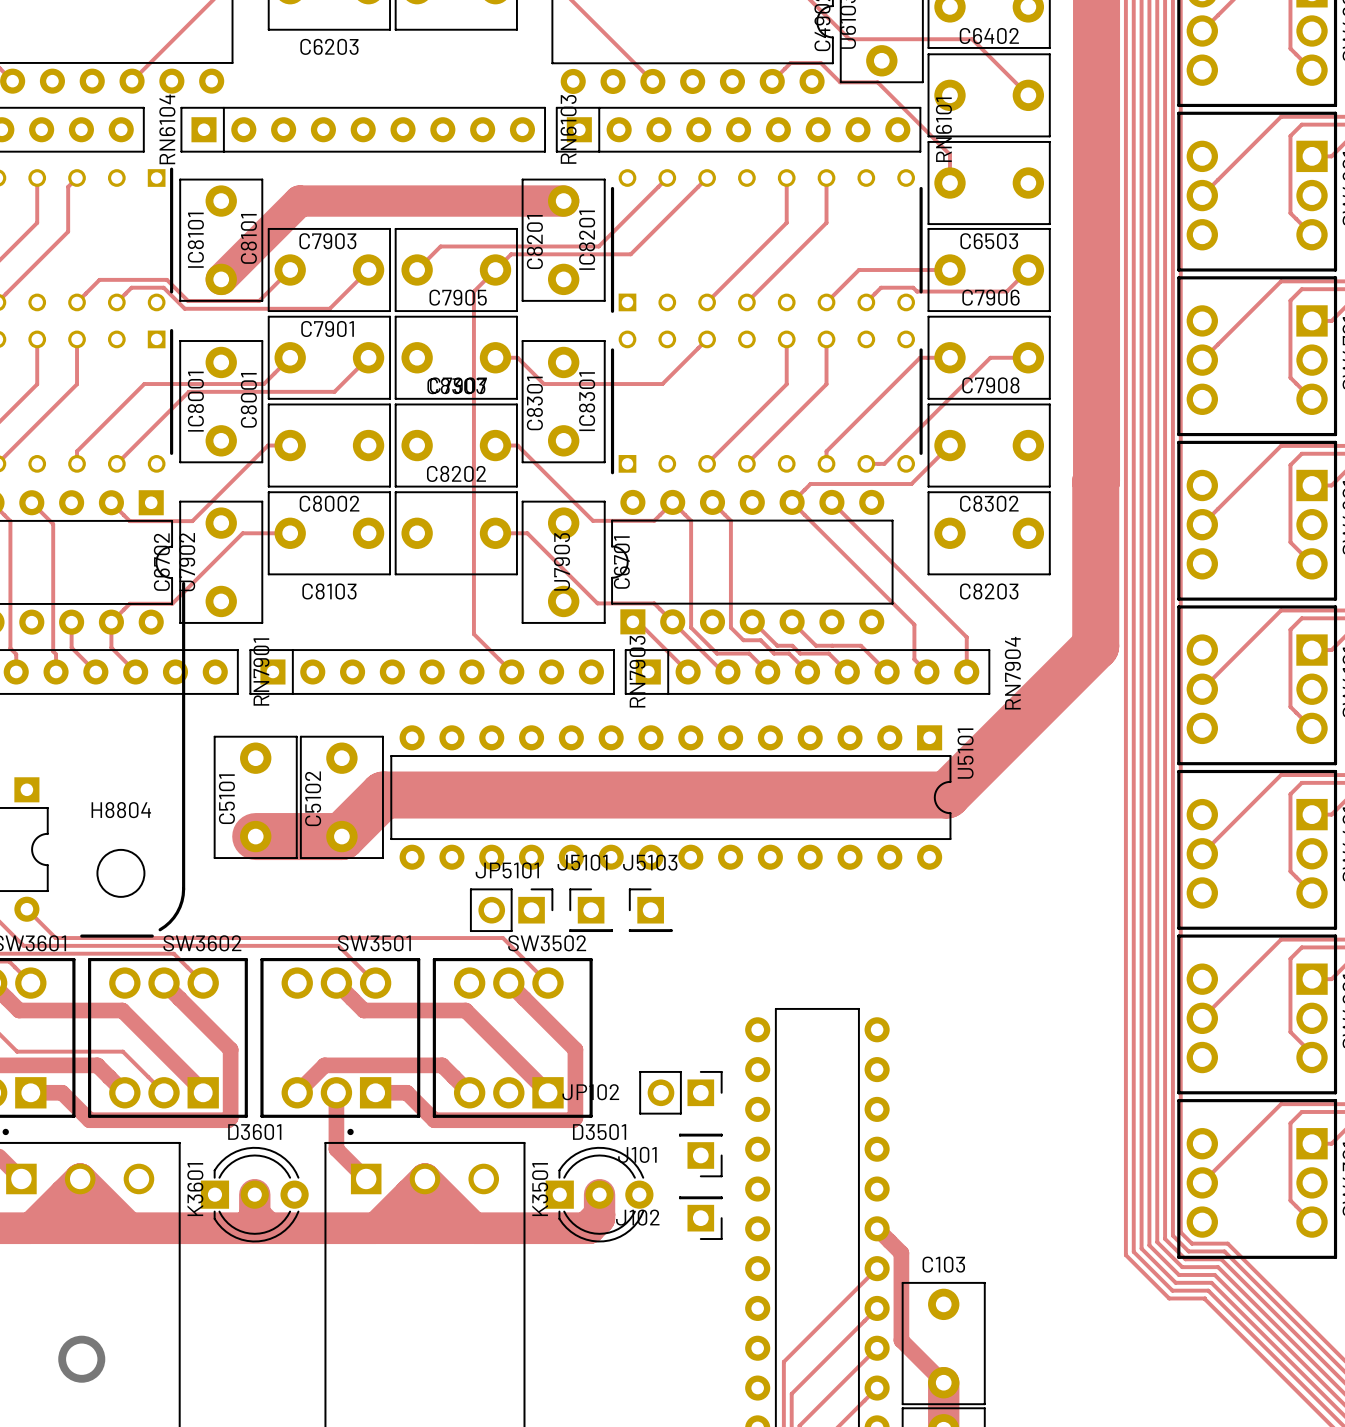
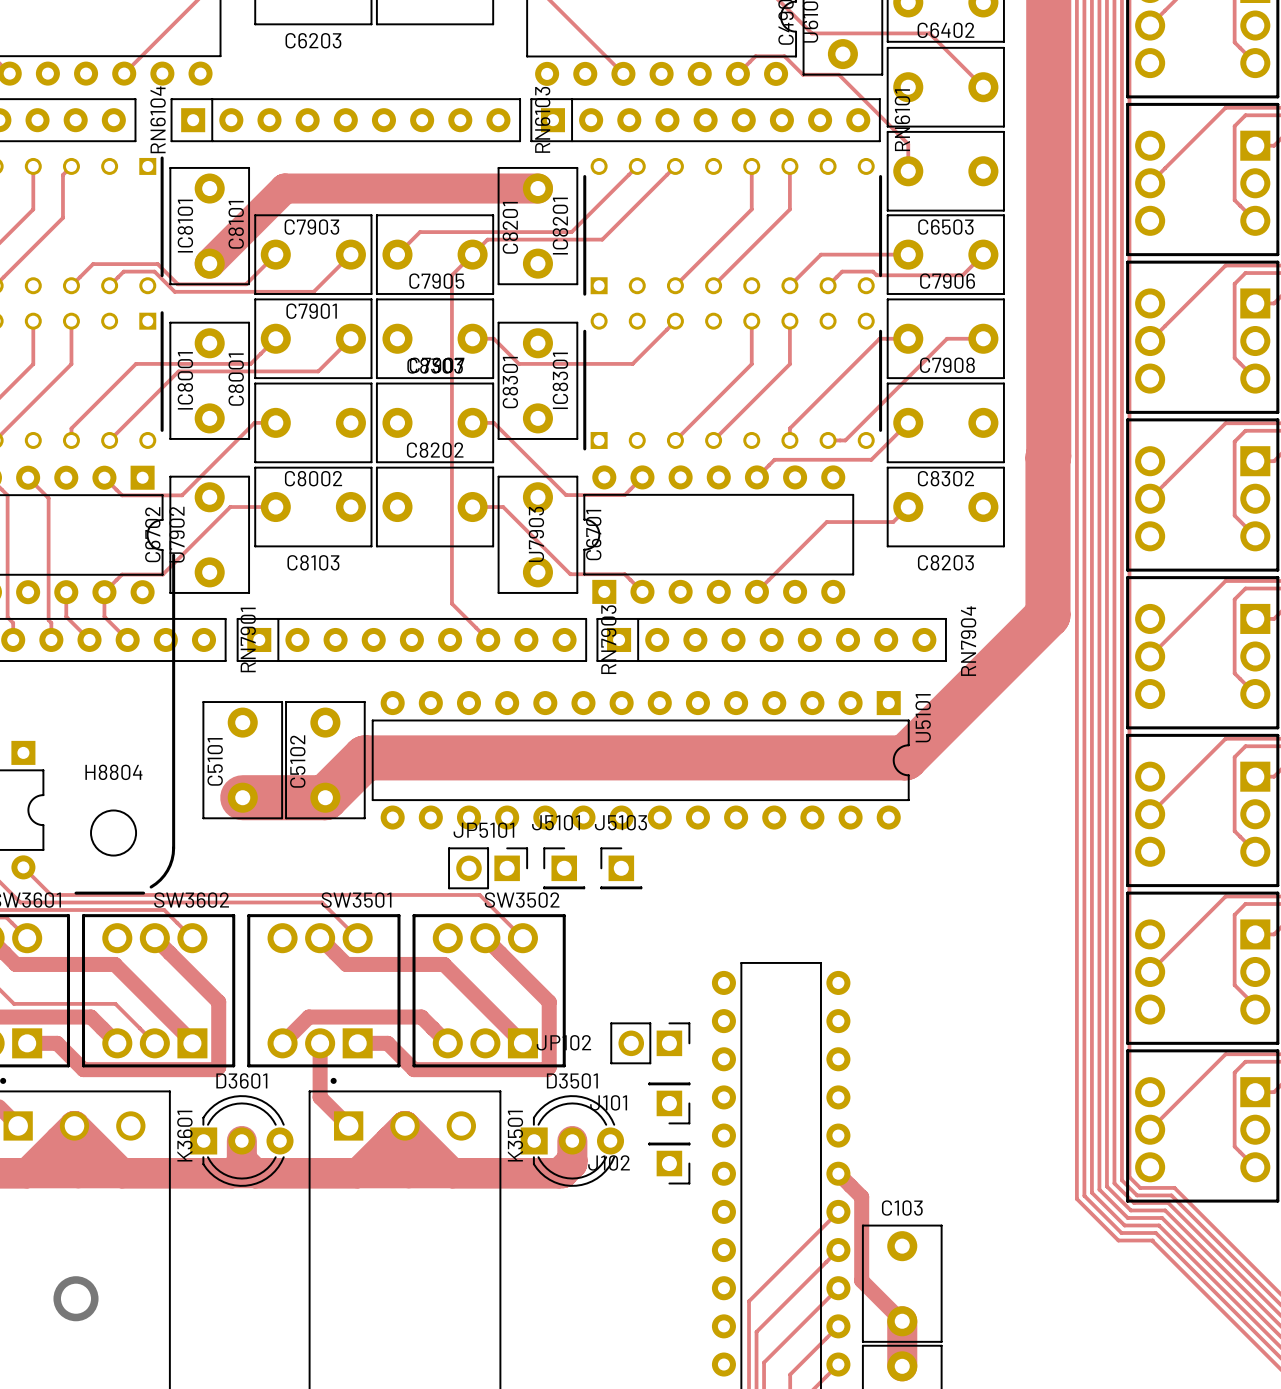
track: (672, 502) (691, 520) (691, 627) (716, 653) (749, 653) (767, 671) -> none
track: (712, 502) (730, 520) (730, 627) (743, 640) (760, 640) (774, 653) (789, 653) (807, 671) -> none
track: (792, 502) (914, 624) (914, 659) (926, 671) -> none
track: (831, 502) (966, 637) (966, 671) -> none
track: (632, 621) (637, 621) (688, 671) -> none
track: (672, 621) (722, 671) (727, 671) -> none
track: (752, 621) (777, 645) (792, 645) (800, 653) (828, 653) (847, 671) -> none
track: (792, 621) (816, 645) (860, 645) (887, 671) -> (756, 591) (826, 522) (893, 522) (908, 507)

